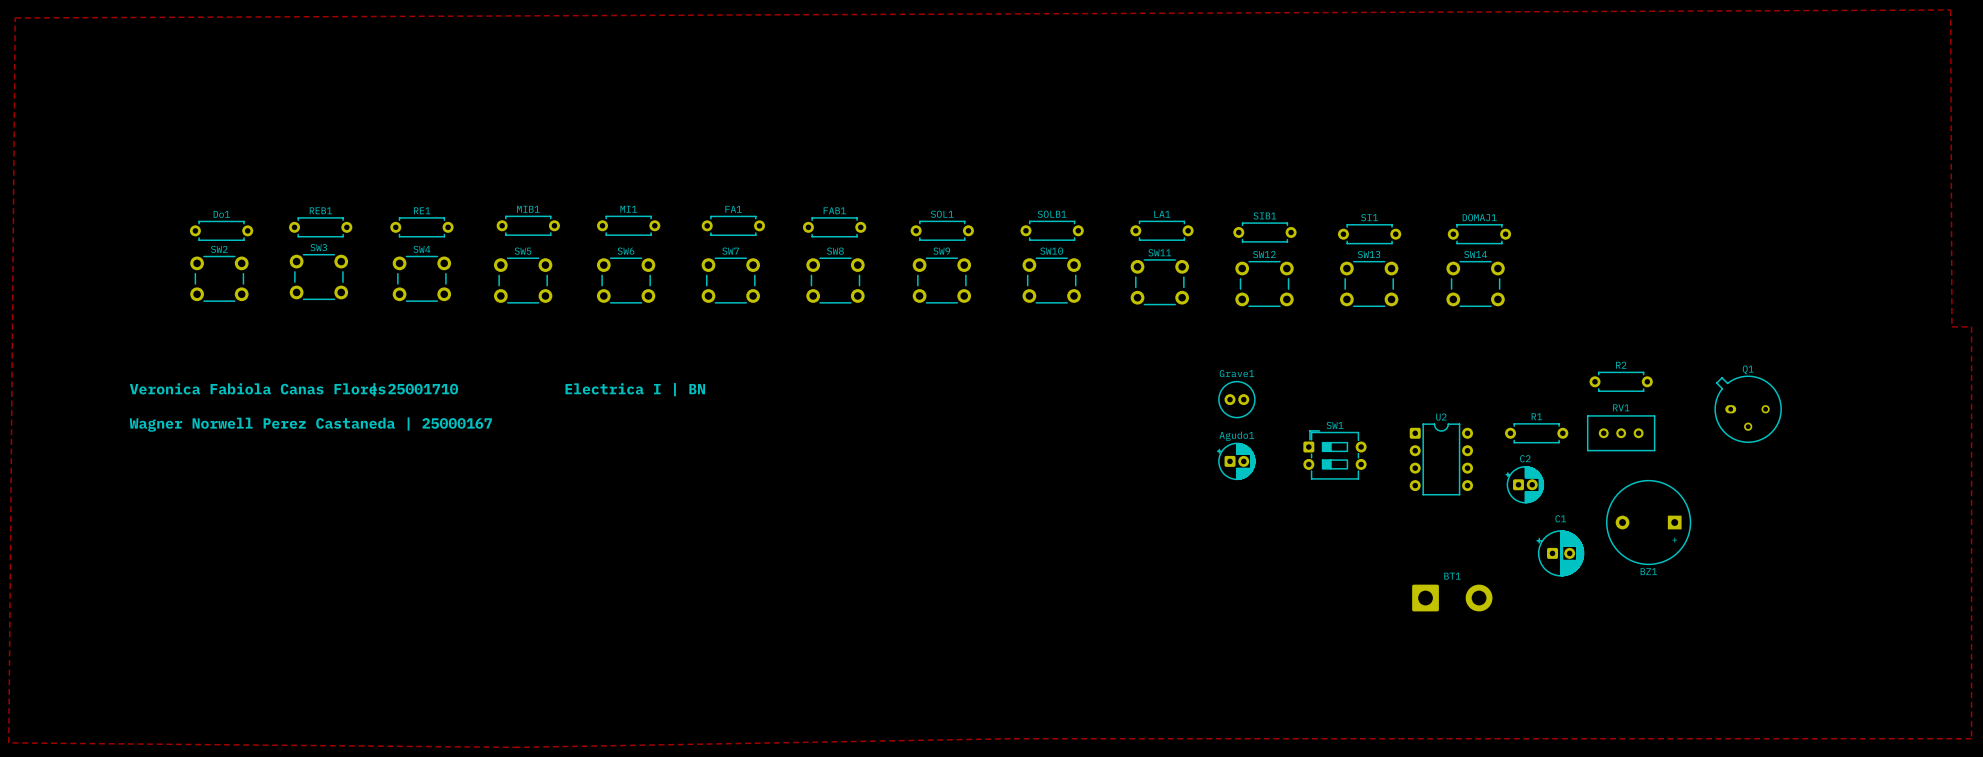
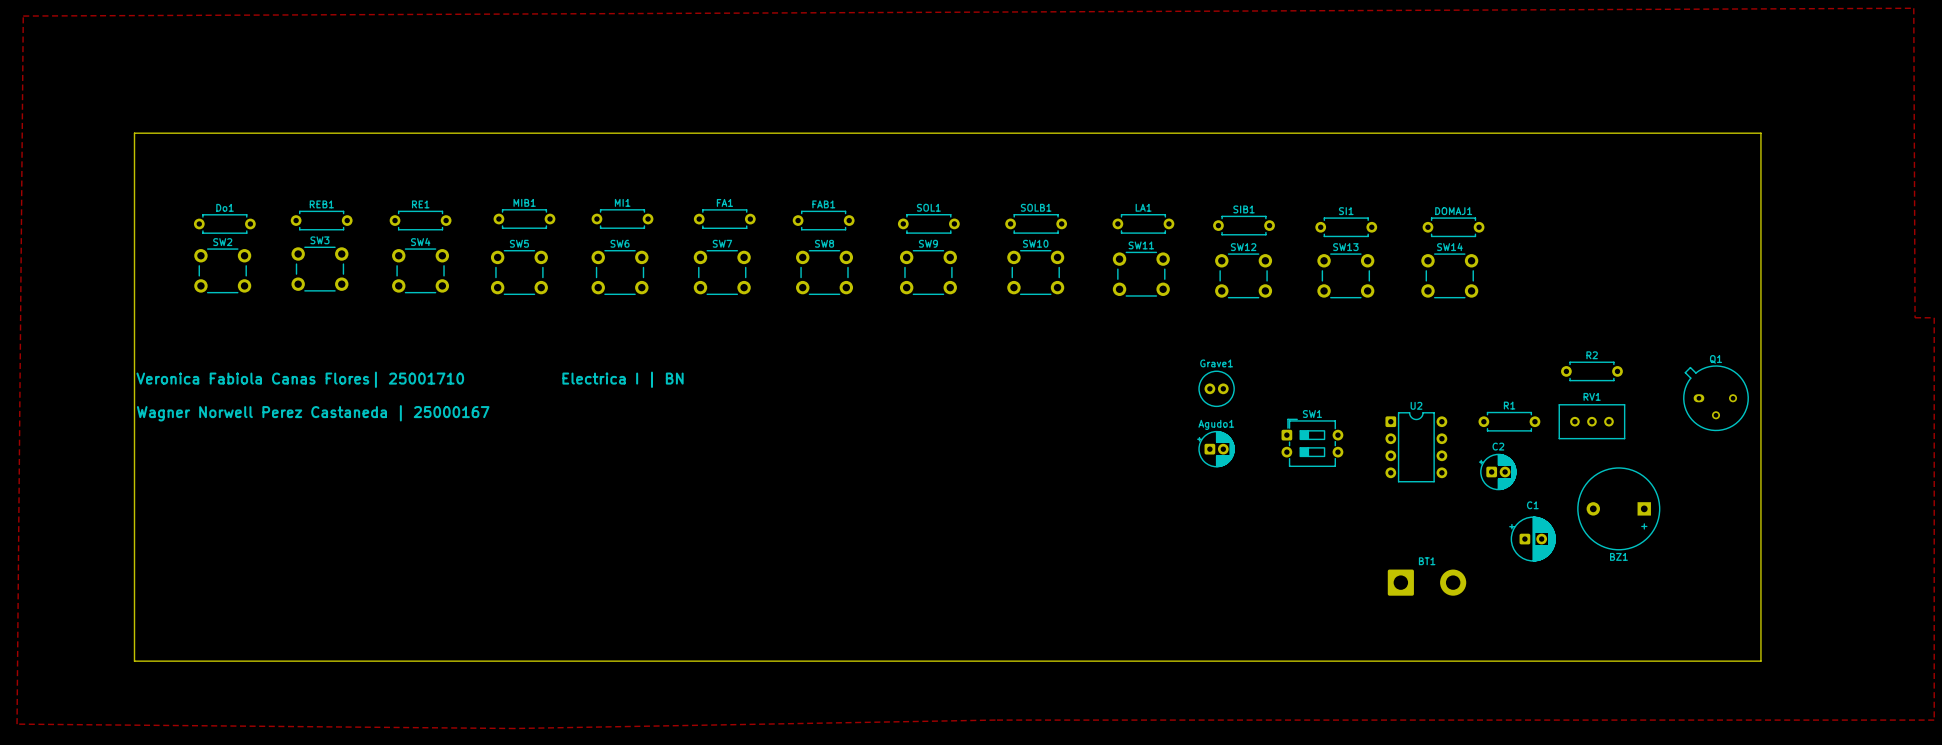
board edge: none -> (134, 133) (1760, 133) (1760, 661) (134, 661) (134, 133)

